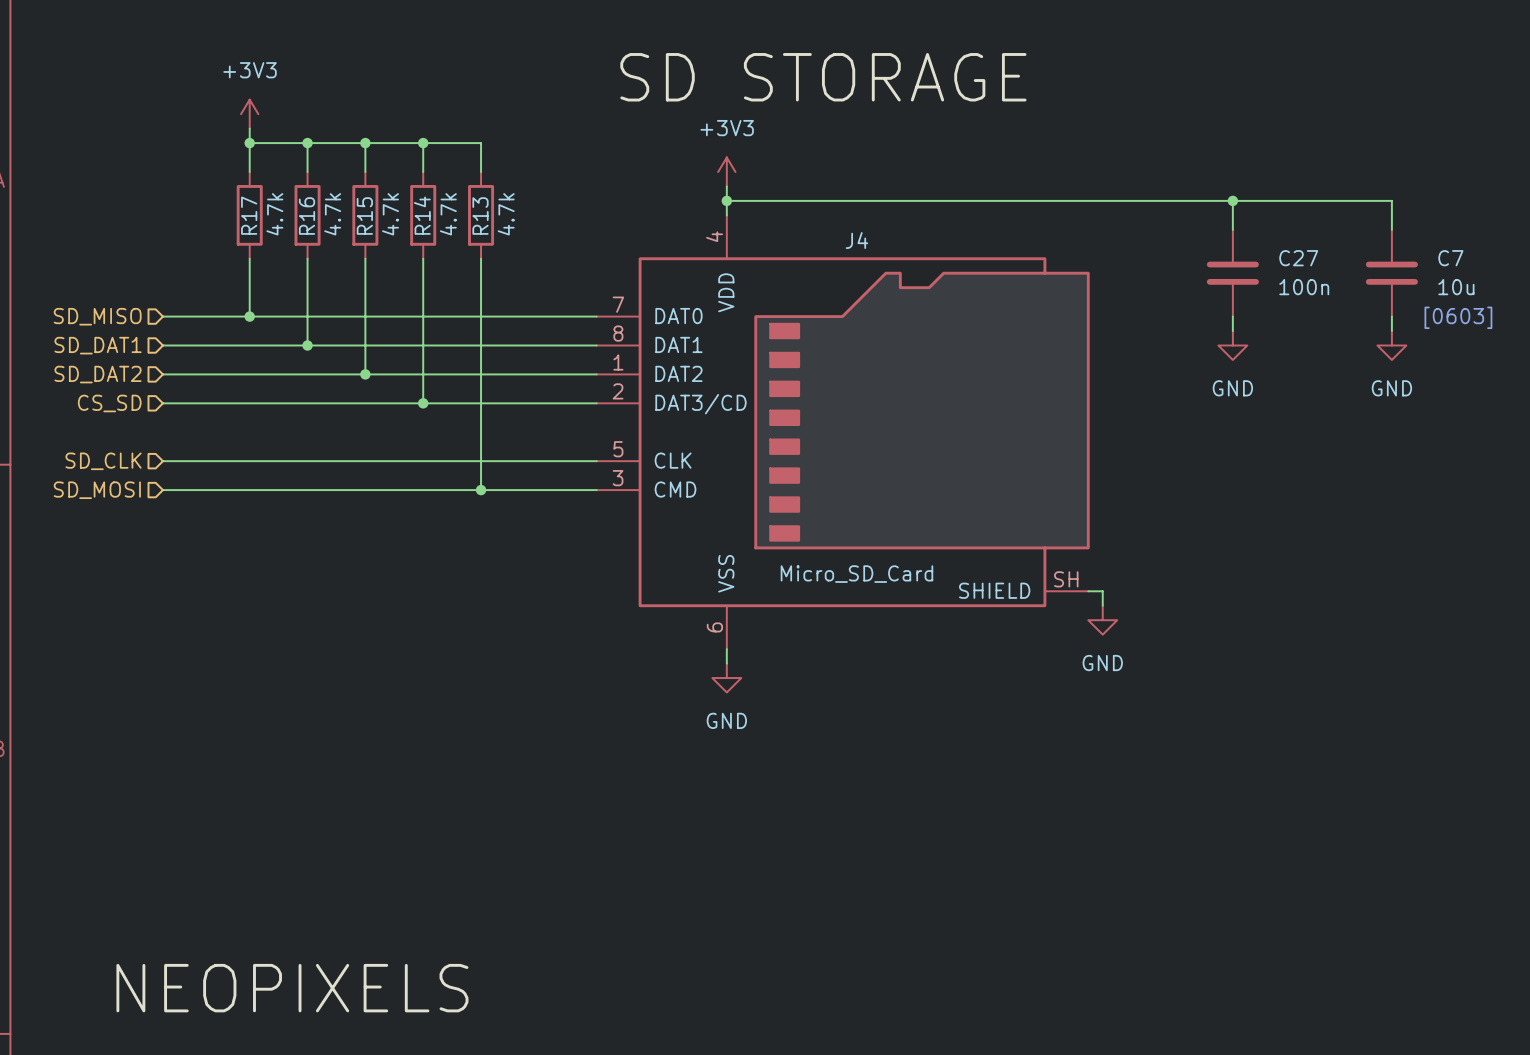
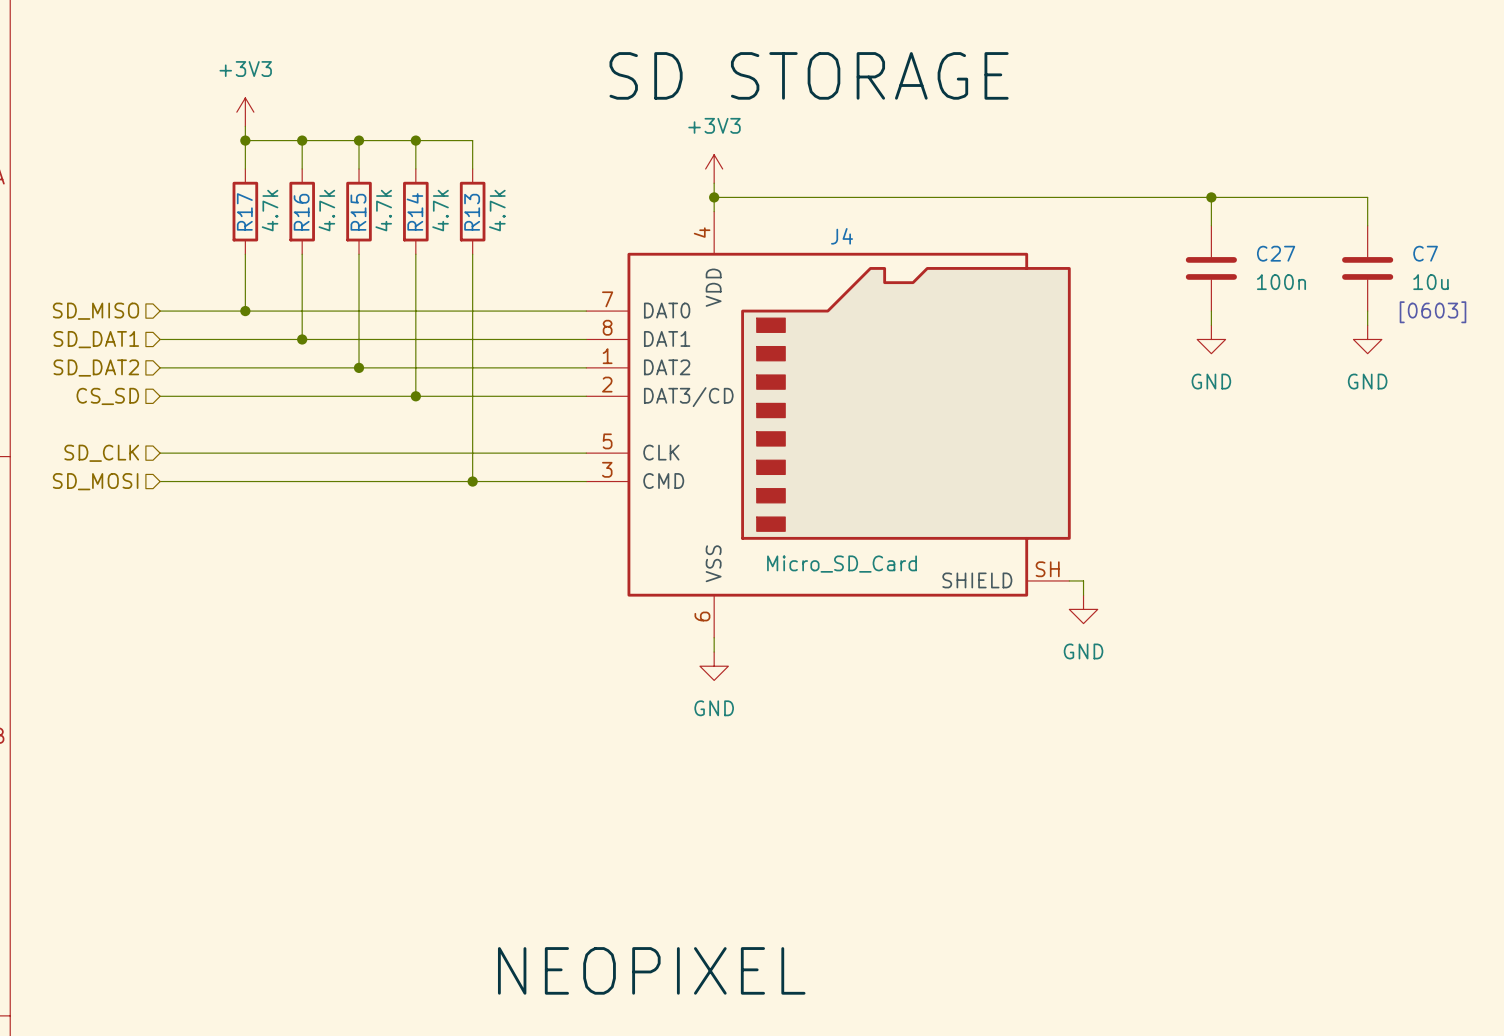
label: NEOPIXELS (292, 988) -> none
label: none -> NEOPIXEL (651, 970)

